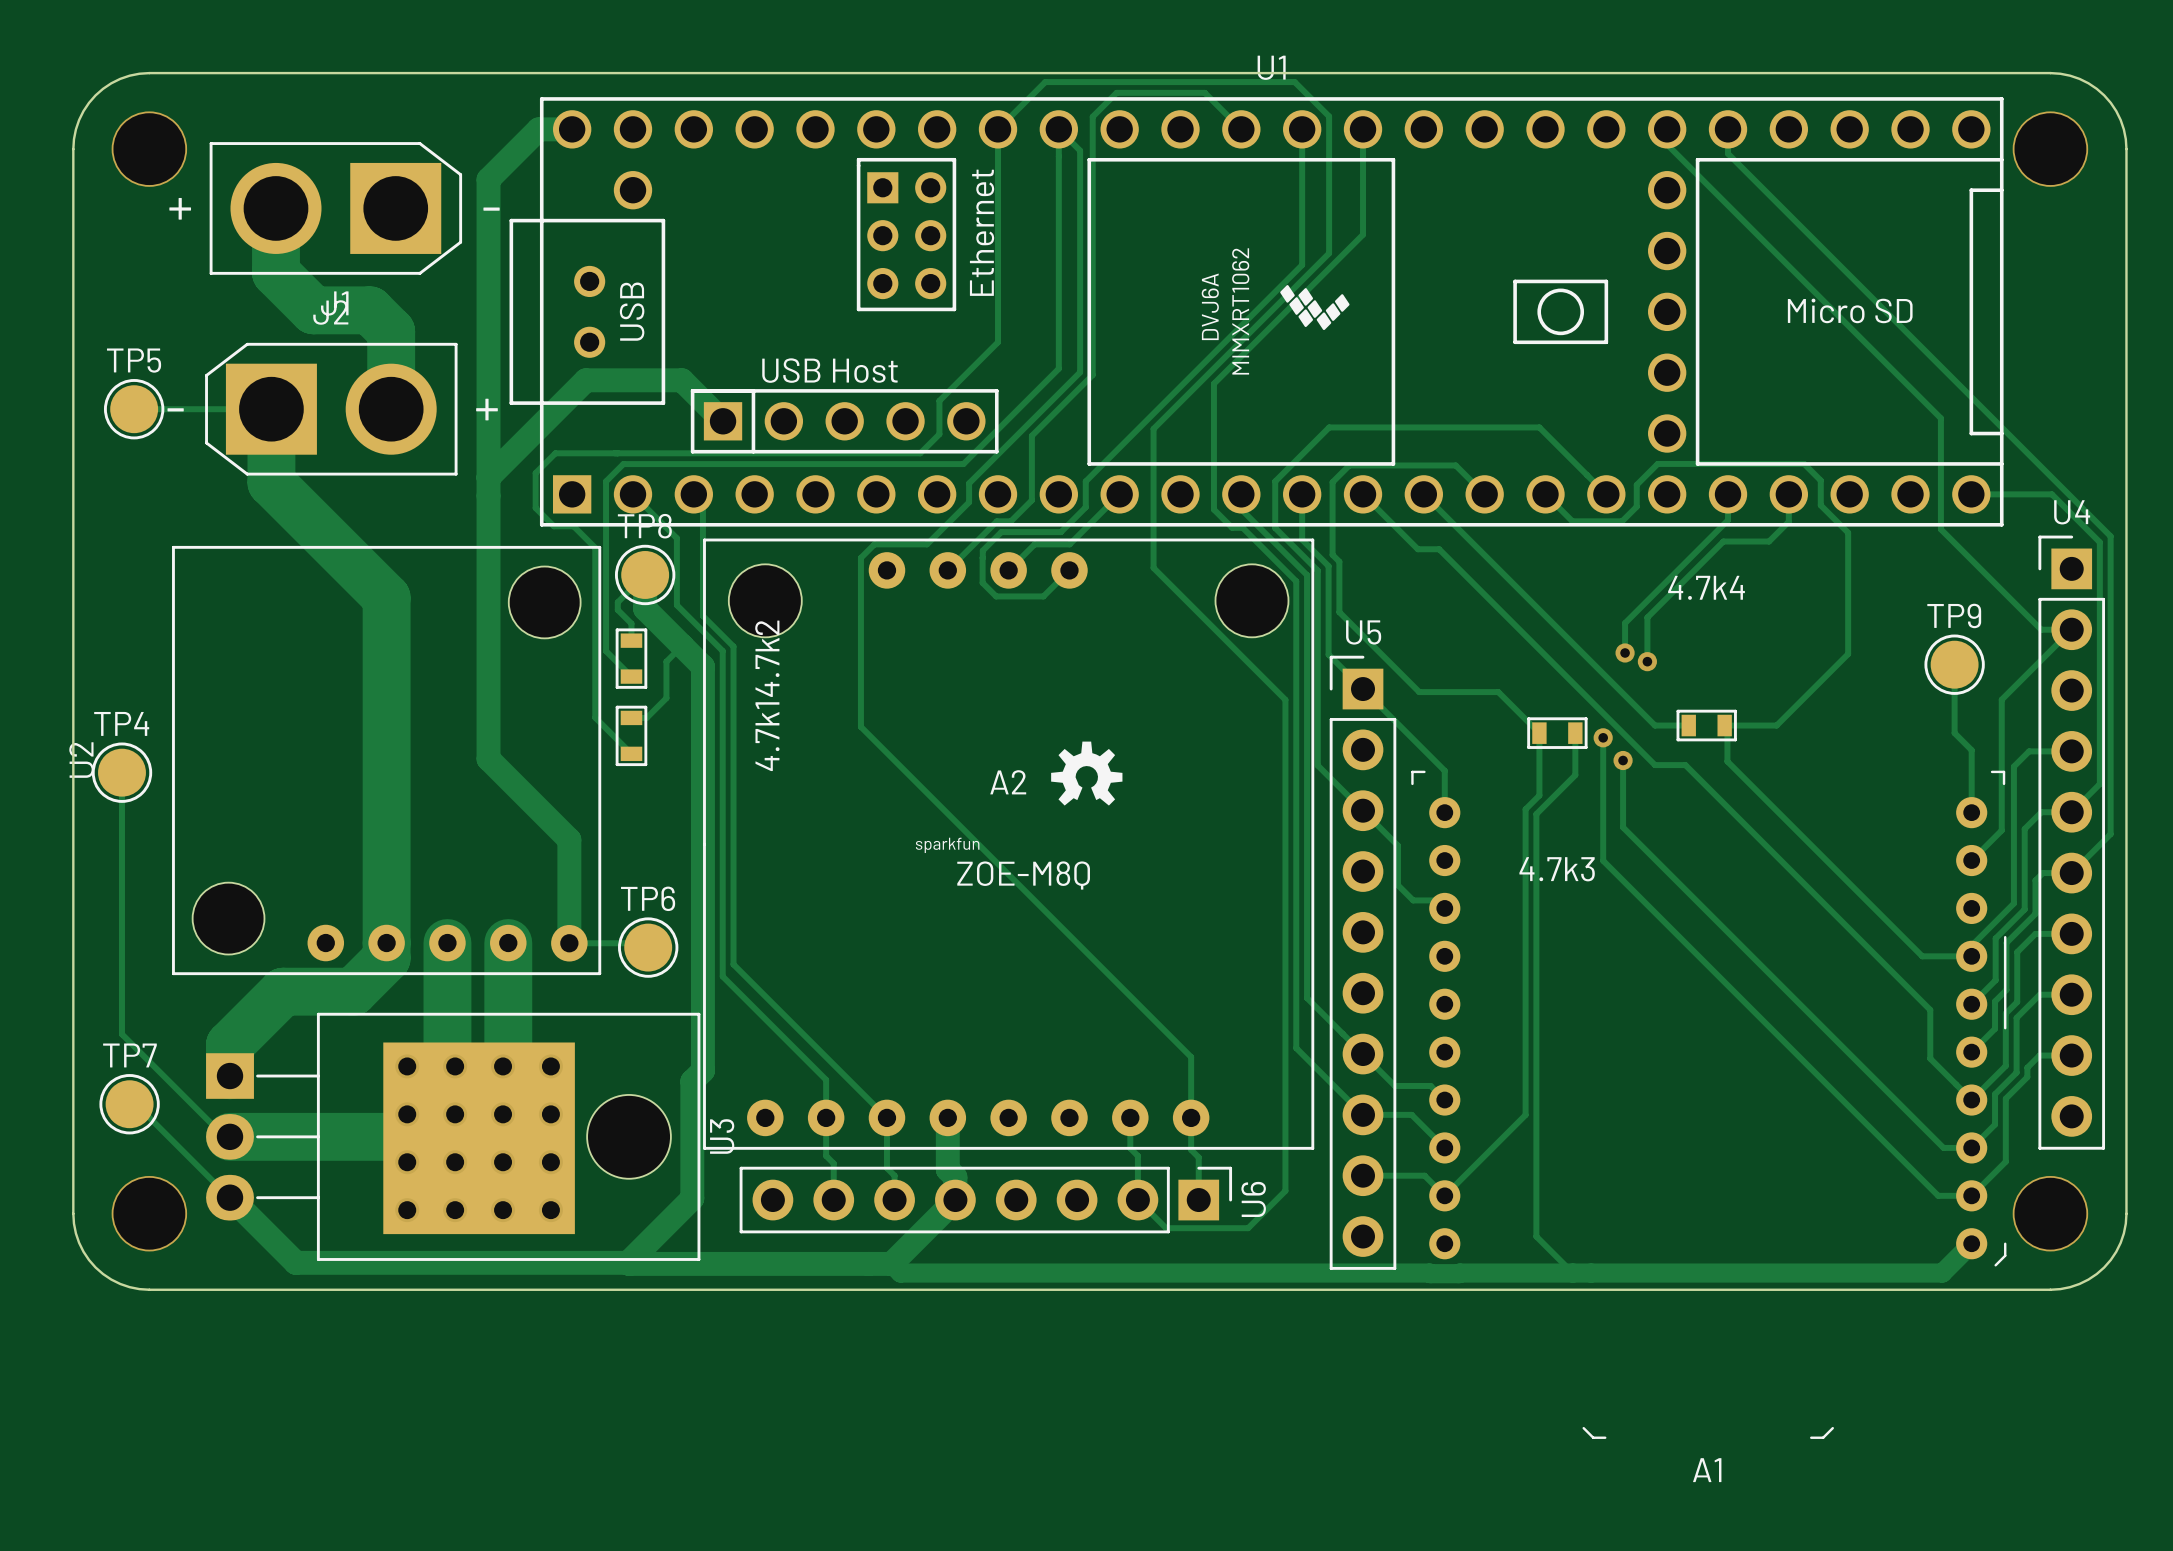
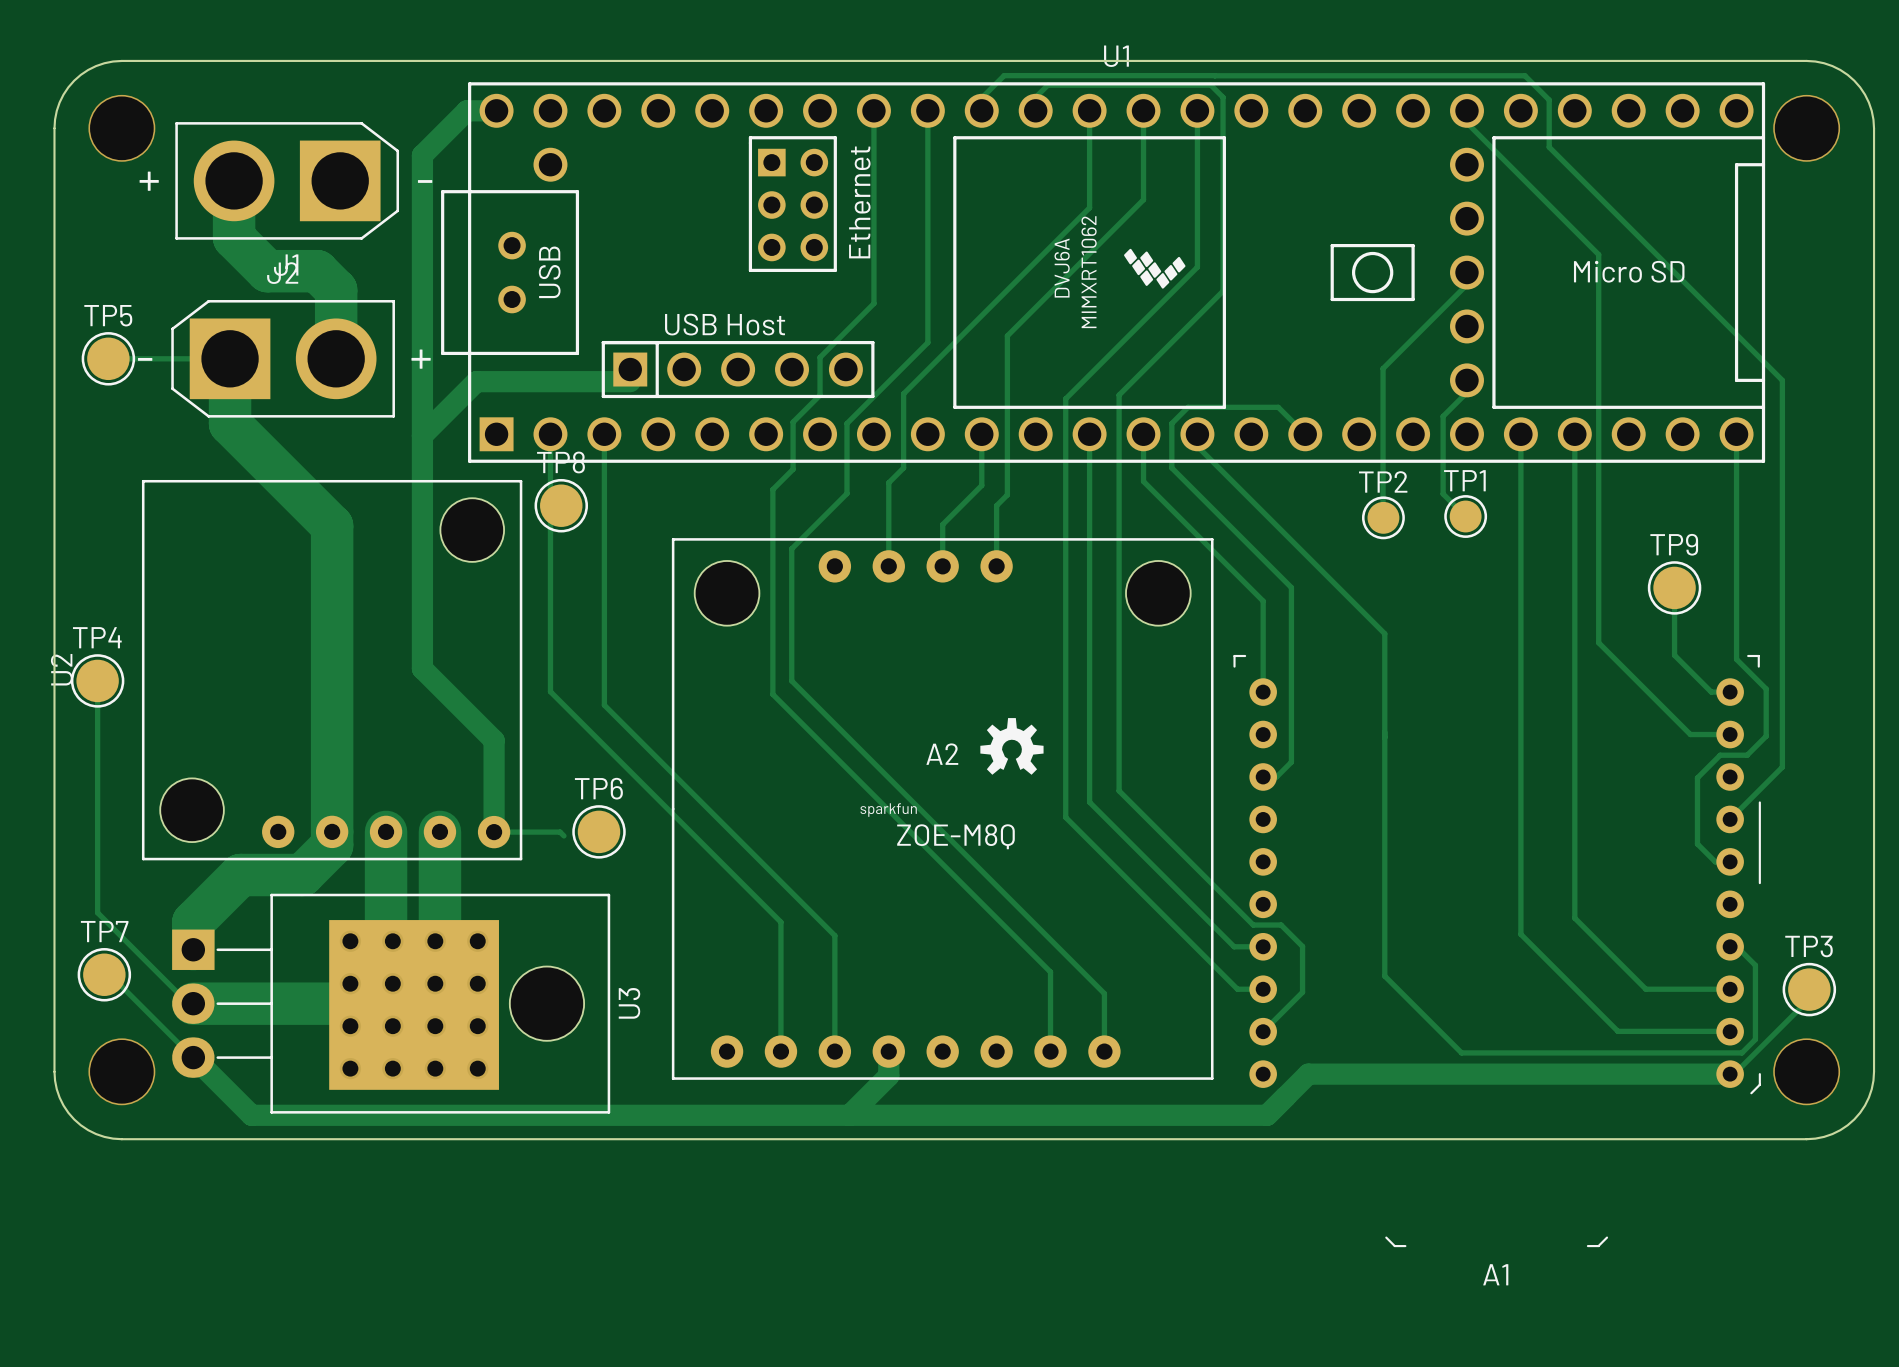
track: (1241, 129) (1204, 92) (1116, 92) (1092, 116) (1092, 375) (1031, 435) (1031, 500) (1010, 521) (996, 521) (947, 570) -> none
track: (1667, 129) (1667, 144) (1940, 418) (1940, 529) (2041, 629) (2071, 629) (2001, 699) (2001, 830) (1971, 860) -> none
track: (1728, 129) (1728, 153) (2110, 536) (2110, 834) (2071, 873) (2042, 873) (2035, 880) (2035, 913) (2006, 942) (2006, 990) (1995, 1001) (1995, 1028) (1971, 1052) -> none
track: (998, 143) (998, 129) (1045, 82) (1294, 82) (1329, 116) (1329, 253) (1153, 428) (1153, 567) (1285, 699) (1285, 1190) (1248, 1228) (1166, 1228) (1137, 1200) (1137, 1155) (1130, 1148) (1130, 1117) -> none
track: (1058, 143) (1058, 129) (1080, 150) (1080, 372) (969, 483) (969, 502) (927, 544) (874, 544) (860, 557) (860, 726) (1191, 1057) (1191, 1149) (1198, 1157) (1198, 1200) -> none
track: none -> (981, 122) (981, 98) (1004, 75) (1524, 75) (1549, 100) (1549, 147) (1782, 380) (1782, 767) (1730, 819)
track: none -> (1035, 122) (1035, 97) (1047, 85) (1210, 85) (1223, 97) (1223, 291) (1119, 395) (1119, 790) (1253, 925) (1281, 925) (1302, 946) (1302, 992) (1263, 1031) (1263, 1027)
track: none -> (1089, 122) (1089, 207) (903, 393) (903, 467) (888, 482) (888, 566)
track: none -> (1466, 122) (1598, 254) (1598, 642) (1690, 734) (1730, 734)
track: (1302, 229) (1302, 265) (1085, 481) (1085, 507) (1060, 532) (1001, 532) (982, 550) (982, 557) -> (1143, 199) (1007, 335) (1007, 494) (996, 505) (996, 566)
track: (1363, 234) (1213, 383) (1213, 509) (1232, 527) (1242, 527) (1296, 581) (1296, 1048) (1363, 1114) (1411, 1114) (1444, 1147) -> (1197, 204) (1197, 267) (1065, 398) (1065, 817) (1237, 989) (1263, 989)
track: none -> (1466, 284) (1383, 368) (1383, 516)
track: (998, 342) (939, 400) (939, 434) (920, 453) (555, 453) (535, 473) (535, 508) (553, 526) (573, 526) (595, 547) (595, 717) (631, 753) -> (873, 299) (873, 303) (820, 357) (820, 395) (793, 422) (793, 469) (772, 489) (772, 694) (1050, 972) (1050, 1051)
track: (1058, 368) (963, 464) (623, 464) (606, 481) (606, 651) (631, 676) -> (927, 322) (927, 342) (847, 423) (847, 493) (791, 548) (791, 680) (1104, 993) (1104, 1051)
track: (723, 421) (682, 380) (585, 380) (488, 477) -> none
track: none -> (630, 381) (476, 381) (422, 435)
track: none -> (1466, 392) (1443, 416) (1443, 493) (1465, 516)
track: (1455, 465) (1349, 465) (1332, 482) (1332, 554) (1339, 561) (1339, 612) (1419, 692) (1498, 692) (1539, 733) (1539, 795) (1525, 809) (1525, 1115) (1444, 1195) (1424, 1175) (1363, 1175) -> (1279, 408) (1188, 407) (1171, 423) (1171, 467) (1291, 587) (1291, 762) (1276, 776) (1263, 776)
track: (632, 494) (676, 538) (676, 605) (722, 651) (722, 976) (826, 1079) (826, 1155) (833, 1163) (833, 1200) -> none
track: (693, 494) (702, 503) (702, 616) (733, 646) (733, 964) (886, 1117) (886, 1168) (894, 1175) (894, 1200) -> none
track: (1119, 494) (1069, 544) (1034, 544) (1008, 570) -> none
track: (1363, 494) (1417, 549) (1439, 549) (1655, 765) (1685, 765) (1930, 1009) (1930, 1058) (1971, 1100) (2005, 1065) (2005, 1013) (2017, 1002) (2017, 952) (2035, 933) (2071, 933) -> none
track: (1423, 494) (1655, 725) (1688, 725) (1685, 728) -> none
track: (1545, 494) (1572, 521) (1622, 521) (1636, 506) (1636, 484) (1657, 463) (1804, 463) (1820, 480) (1820, 505) (1848, 532) (1848, 654) (1776, 725) (1724, 725) (1727, 728) (1727, 761) (1922, 956) (1971, 956) (1971, 945) (2013, 903) (2013, 766) (2029, 751) (2071, 751) -> none
track: (1606, 494) (1539, 427) (1329, 427) (1275, 481) (1275, 528) (1317, 570) (1317, 765) (1397, 845) (1397, 885) (1413, 900) (1436, 900) (1444, 908) -> none
track: (1971, 494) (2051, 494) (2099, 542) (2099, 784) (2071, 812) (2041, 812) (2024, 828) (2024, 909) (1995, 938) (1995, 980) (1971, 1004) -> none
track: none -> (550, 446) (550, 691) (780, 922) (780, 1051)
track: none -> (604, 446) (604, 705) (834, 935) (834, 1051)
track: none -> (981, 446) (981, 485) (942, 524) (942, 566)
track: none -> (1197, 446) (1384, 633) (1384, 976) (1461, 1052) (1741, 1052) (1755, 1039) (1755, 965) (1736, 946) (1730, 946)
track: none -> (1736, 446) (1736, 659) (1766, 689) (1766, 736) (1747, 755) (1720, 755) (1697, 777) (1697, 844) (1715, 861) (1730, 861)
track: (1241, 509) (1307, 575) (1307, 998) (1394, 1085) (1430, 1085) (1444, 1100) -> (1089, 447) (1089, 802) (1234, 946) (1263, 946)
track: (1728, 520) (1625, 623) (1625, 652) -> (1520, 457) (1520, 934) (1617, 1031) (1730, 1031)
track: (1788, 521) (1769, 541) (1723, 541) (1647, 617) (1647, 661) -> (1574, 458) (1574, 918) (1645, 989) (1730, 989)
track: (1302, 539) (1328, 566) (1328, 654) (1444, 770) (1444, 812) -> (1143, 474) (1143, 481) (1263, 601) (1263, 692)
track: (982, 557) (982, 582) (996, 596) (1043, 596) (1069, 570) -> none
track: (645, 574) (617, 602) (617, 609) (631, 623) (631, 640) -> none
track: (645, 574) (645, 608) (702, 666) (702, 1070) (692, 1081) (692, 1198) (628, 1262) (891, 1263) -> none
TP1: none -> (1465, 516)
TP2: none -> (1383, 517)
track: (682, 645) (666, 661) (666, 698) (646, 717) (631, 717) -> none
via: (1625, 652) -> none
4.7k2: (631, 658) -> none
via: (1647, 661) -> none
track: (1954, 664) (1954, 733) (1971, 750) (1971, 812) -> none
TP9 position: (1954, 664) -> (1674, 587)
track: none -> (1674, 587) (1674, 655) (1711, 692) (1730, 692)
4.7k4: (1706, 725) -> none
4.7k3: (1557, 733) -> none
track: (1575, 733) (1575, 775) (1536, 814) (1536, 1236) (1572, 1273) -> none
4.7k1: (631, 735) -> none
track: (1603, 737) (1603, 860) (1938, 1195) (1971, 1195) (2005, 1161) (2005, 1098) (2027, 1077) (2027, 1067) (2039, 1055) (2071, 1055) -> none
via: (1603, 737) -> none
track: (1623, 760) (1623, 827) (1943, 1147) (1971, 1147) (1995, 1124) (1995, 1094) (2016, 1072) (2016, 1017) (2039, 994) (2071, 994) -> none
via: (1623, 760) -> none
U4: (2071, 842) -> none
A2 position: (1008, 844) -> (942, 808)
TP6 position: (648, 947) -> (599, 831)
U5: (1363, 962) -> none
A1 position: (1708, 1104) -> (1497, 951)
track: (947, 1117) (947, 1169) (955, 1177) (955, 1200) (891, 1263) -> none
track: none -> (1809, 989) (1809, 999) (1734, 1074) (1308, 1074) (1267, 1115) (546, 1115)
TP3: none -> (1809, 989)
track: none -> (888, 1051) (888, 1075) (849, 1115)
U6: (985, 1200) -> none
track: (1971, 1243) (1942, 1273) (900, 1273) (891, 1263) -> none

